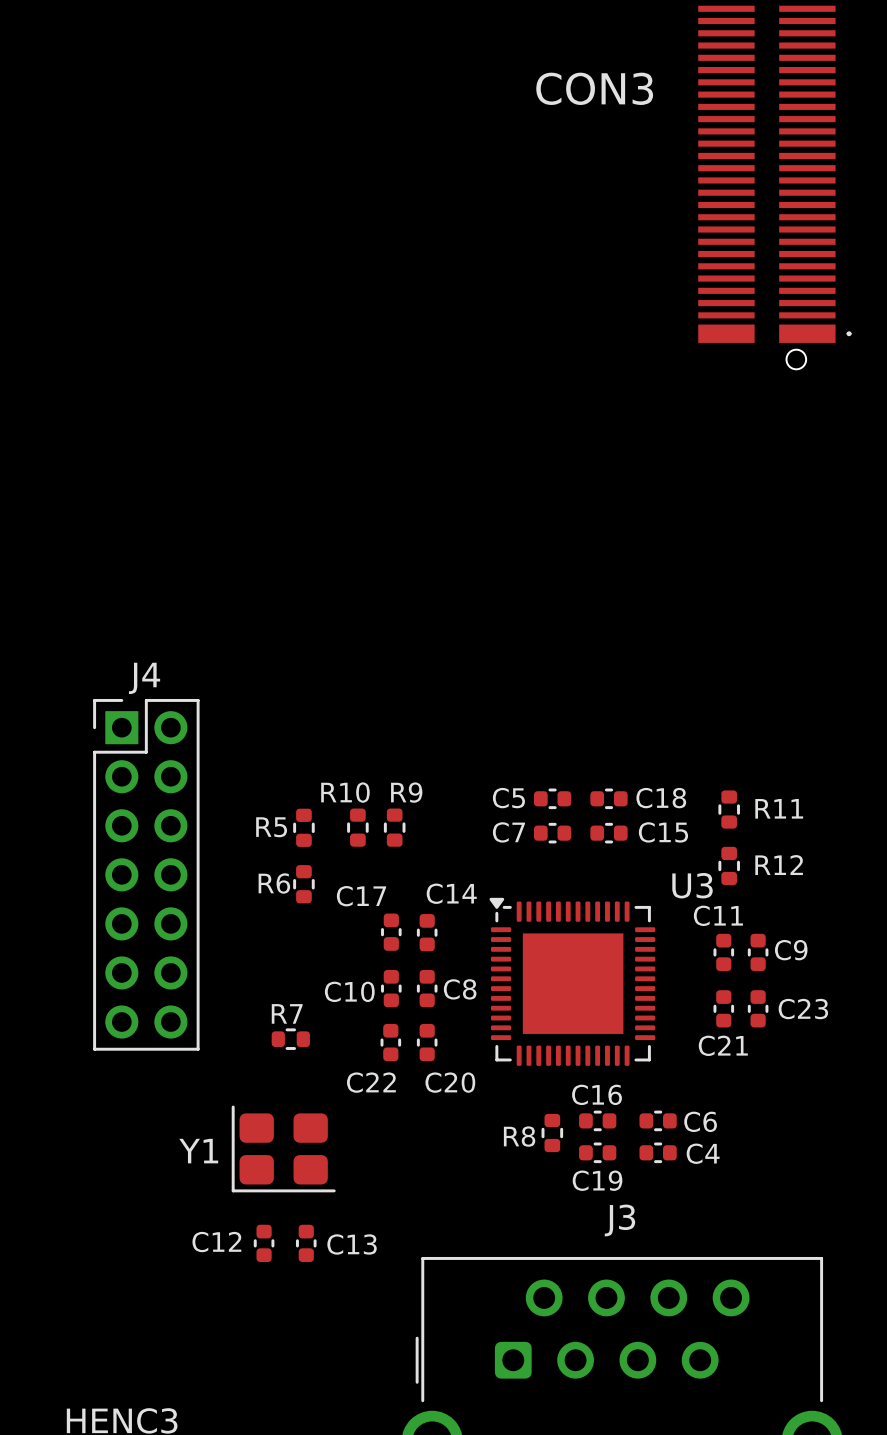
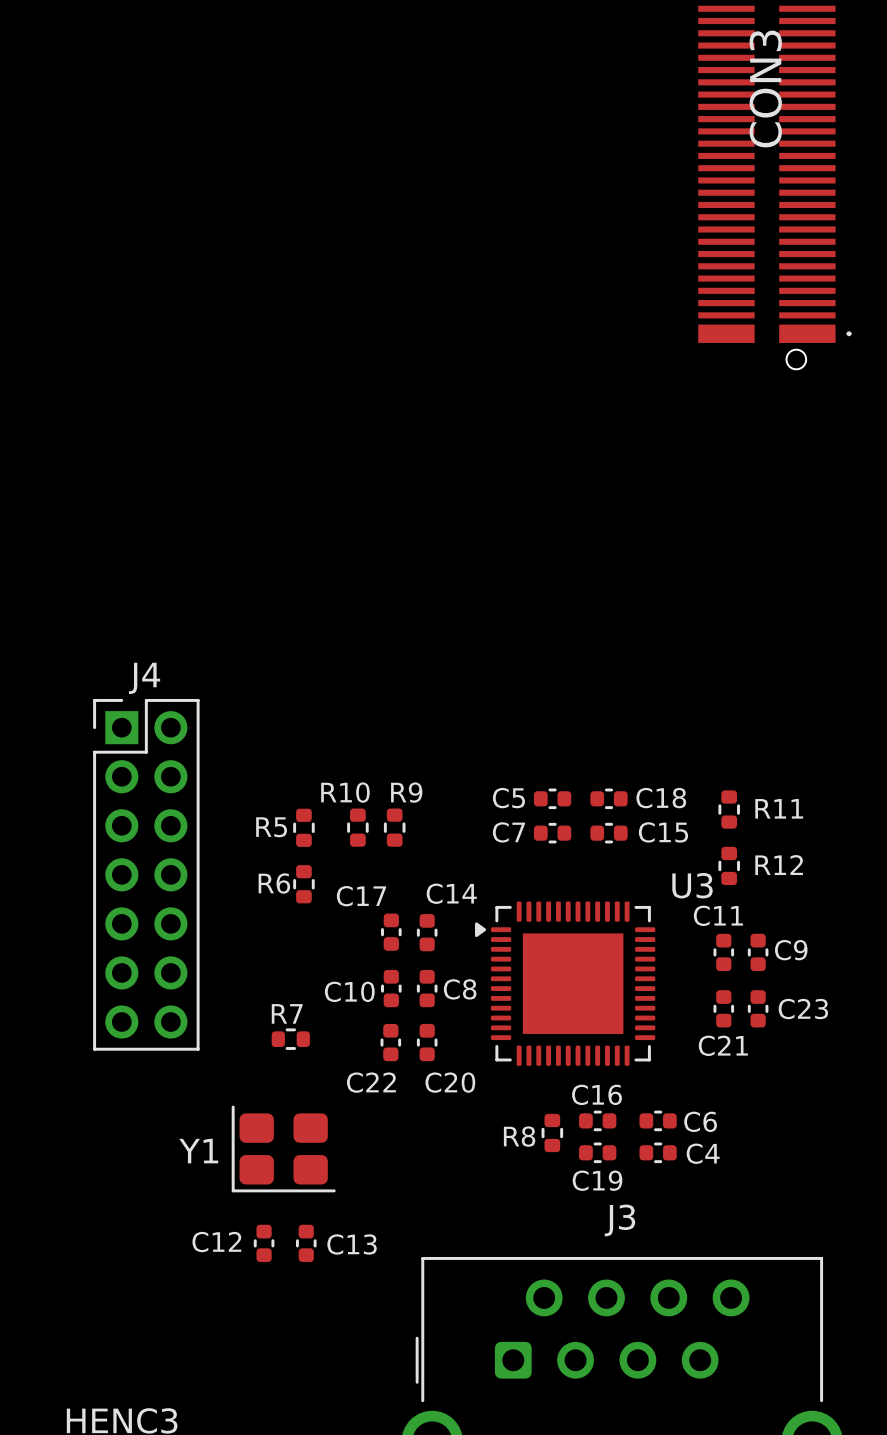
CON3 name rotation: 0° (594, 88) -> 90° counterclockwise (765, 88)
CON3 name position: CON3 (594, 88) -> CON3 (765, 88)
U3 footprint: [489, 897, 656, 1066] -> [475, 901, 656, 1066]

